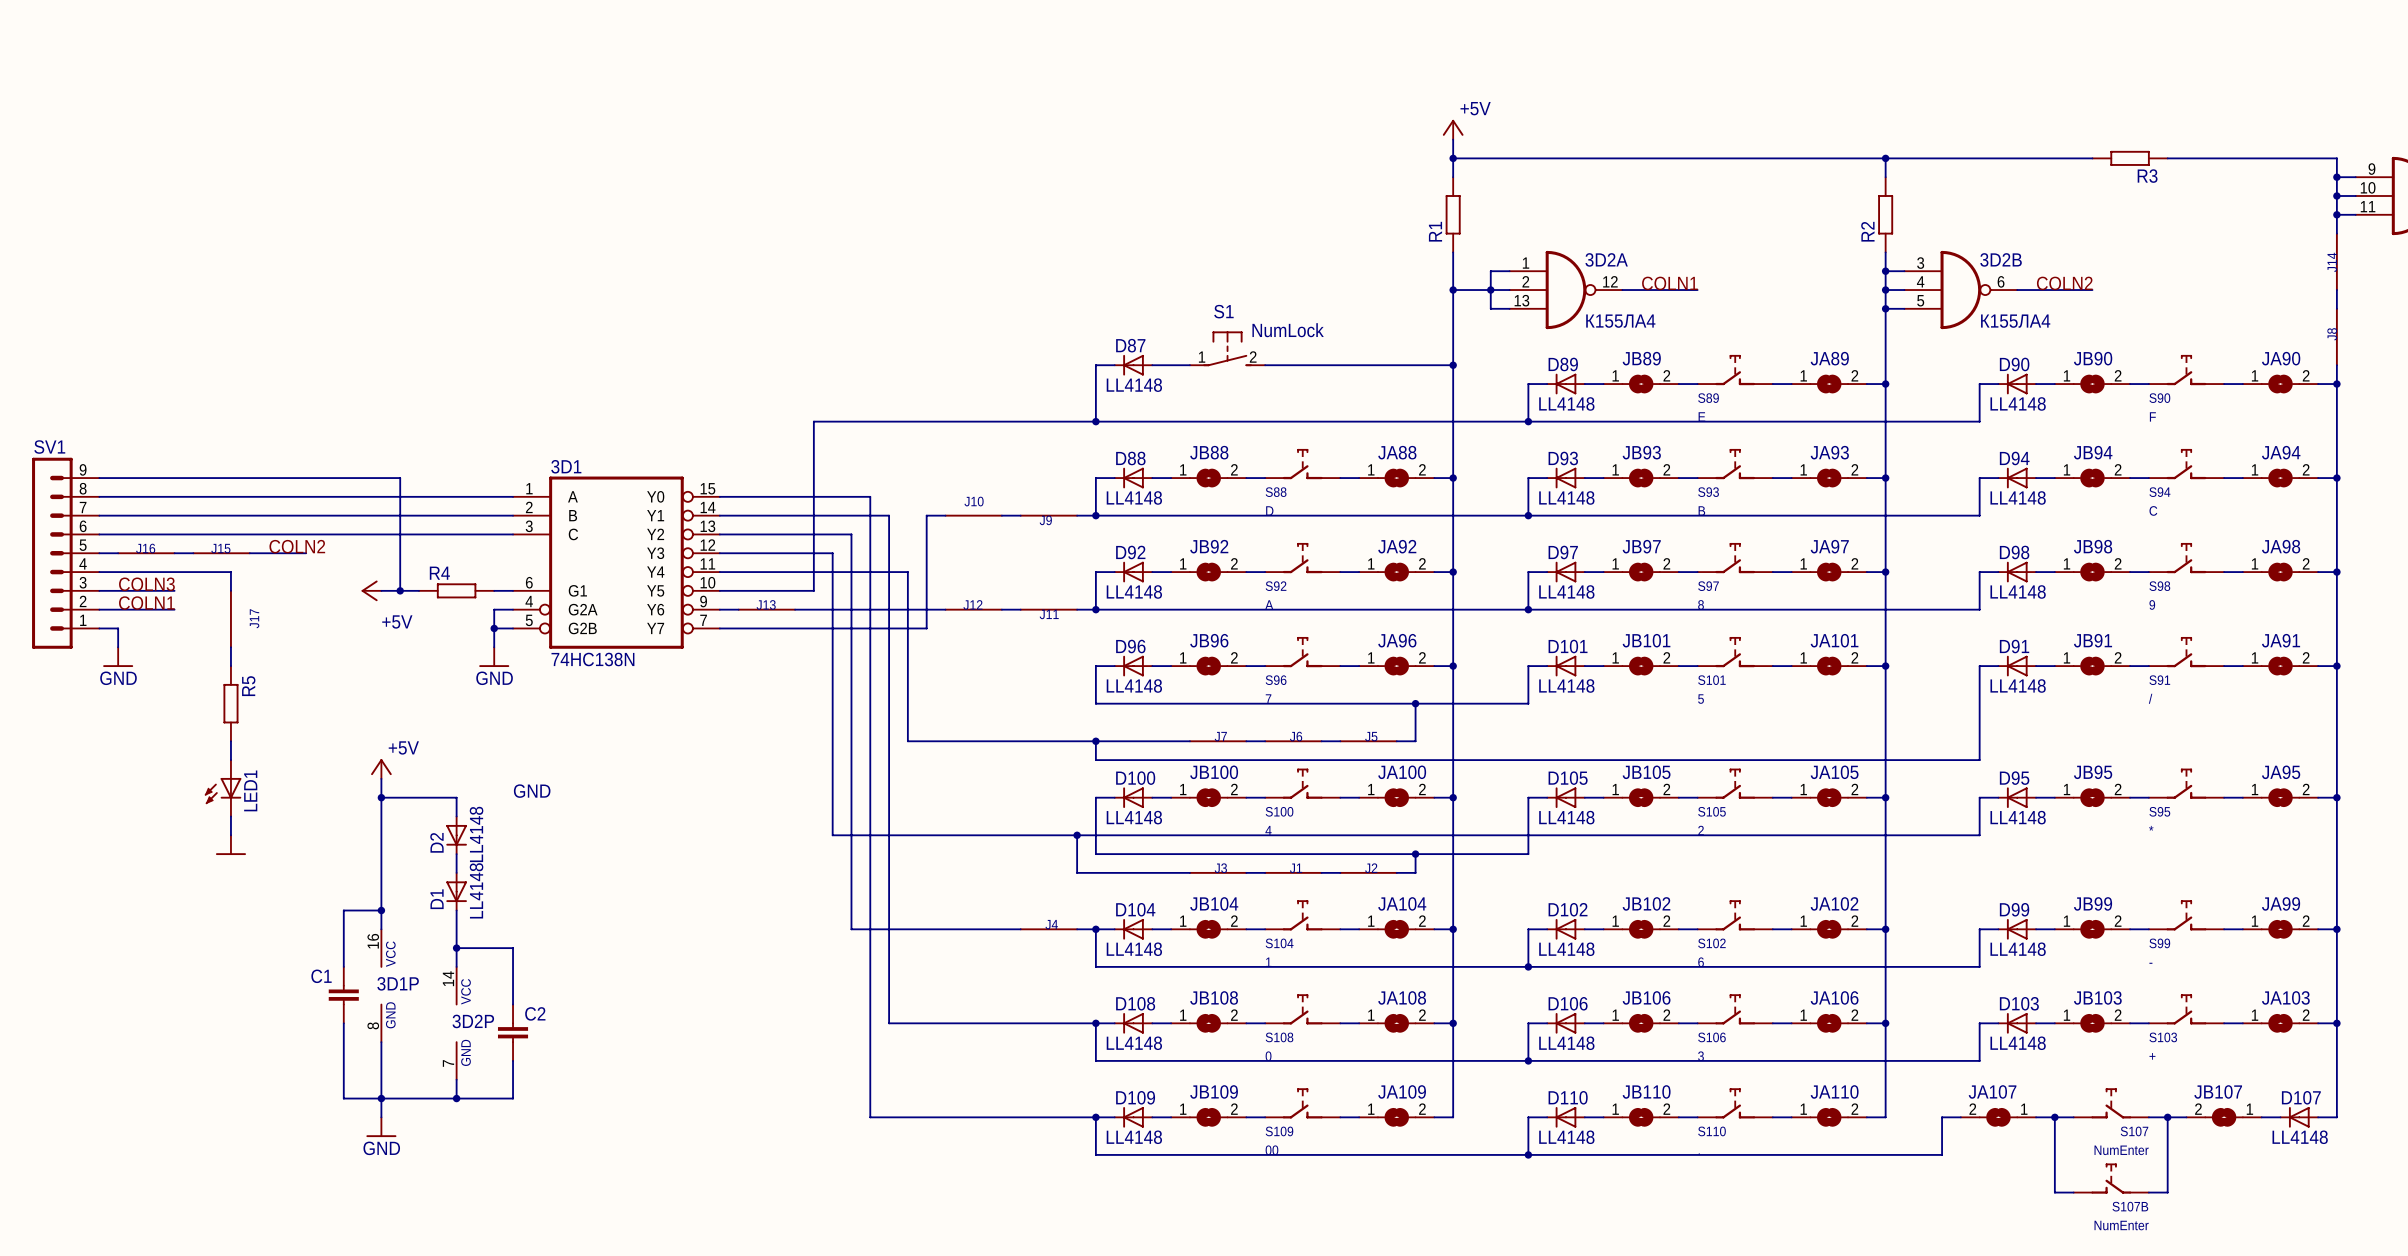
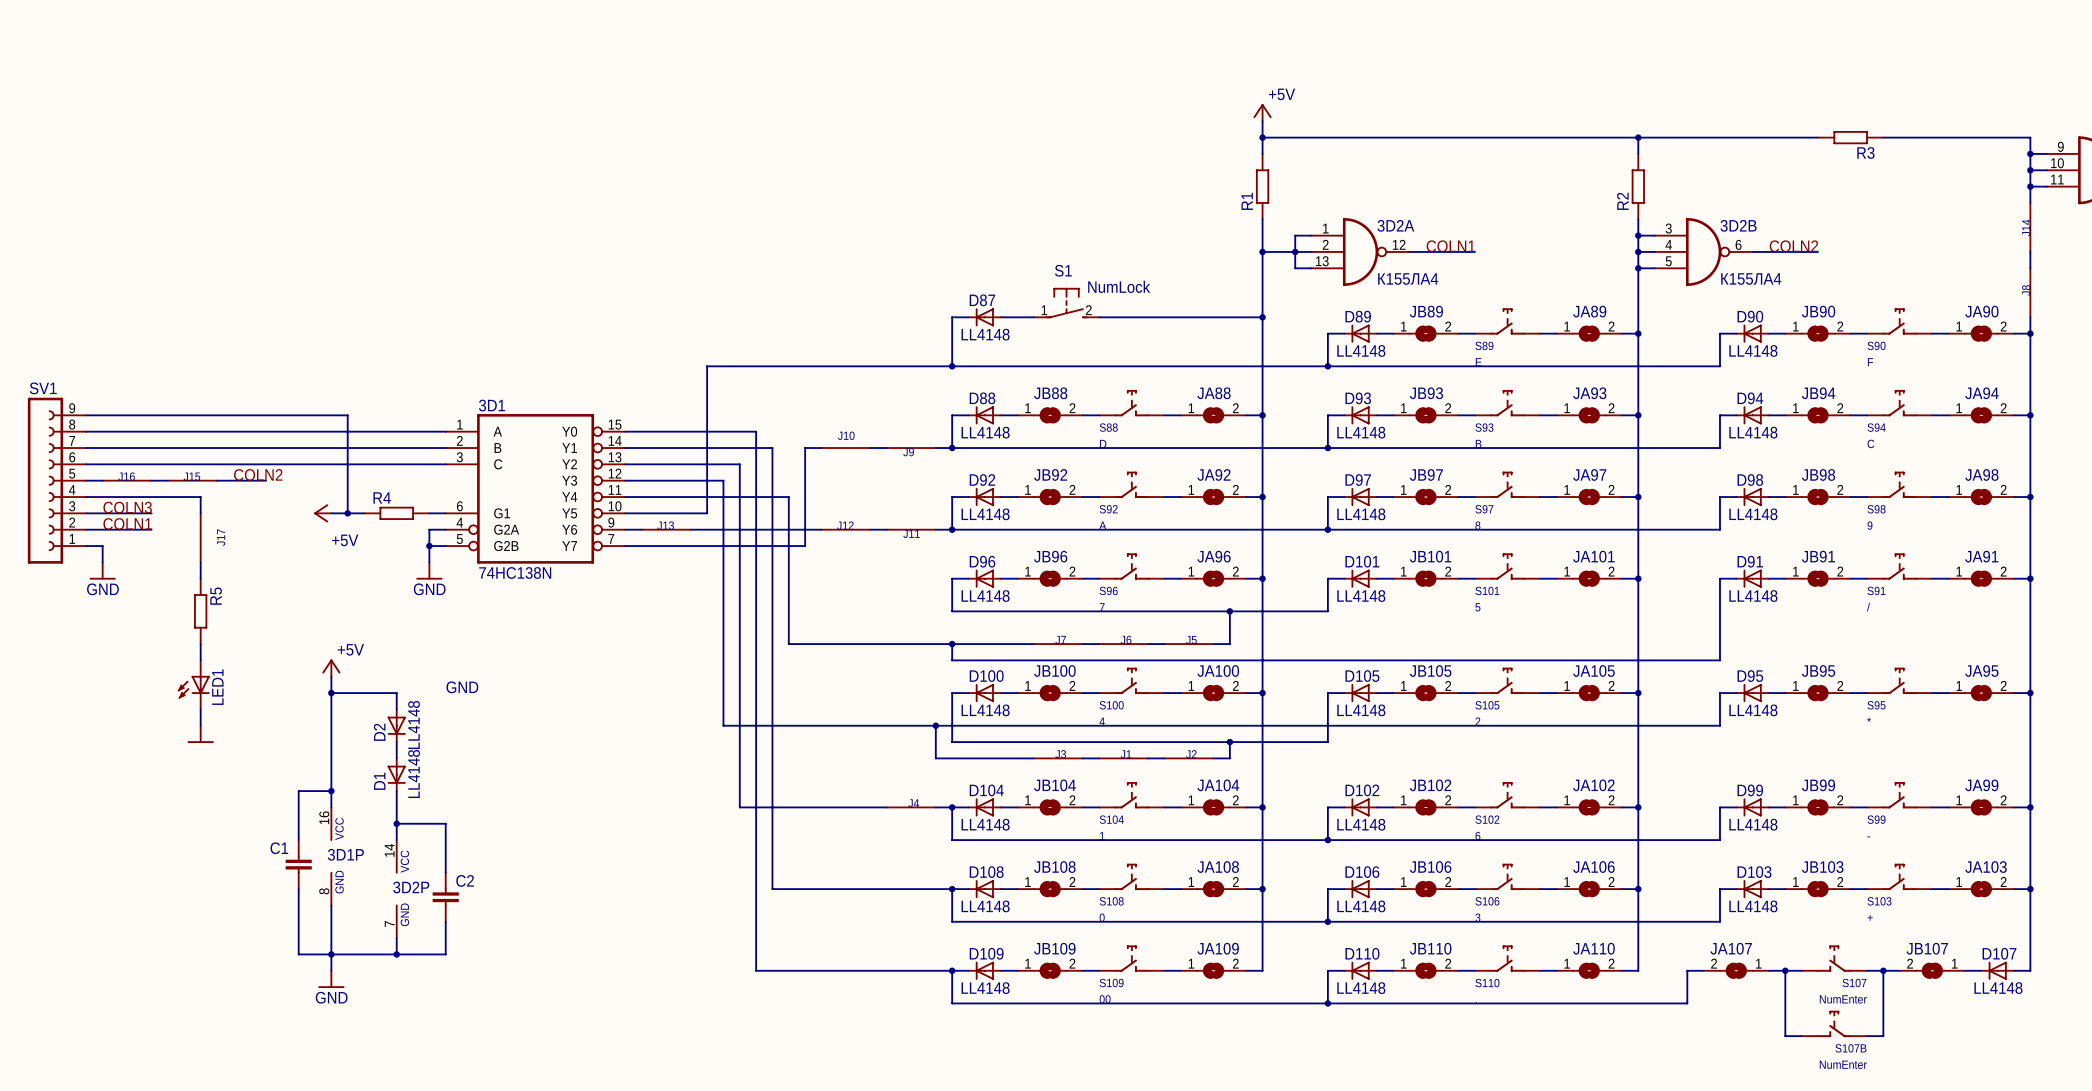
SV1 symbol: [32, 457, 100, 649] -> [27, 397, 87, 564]

